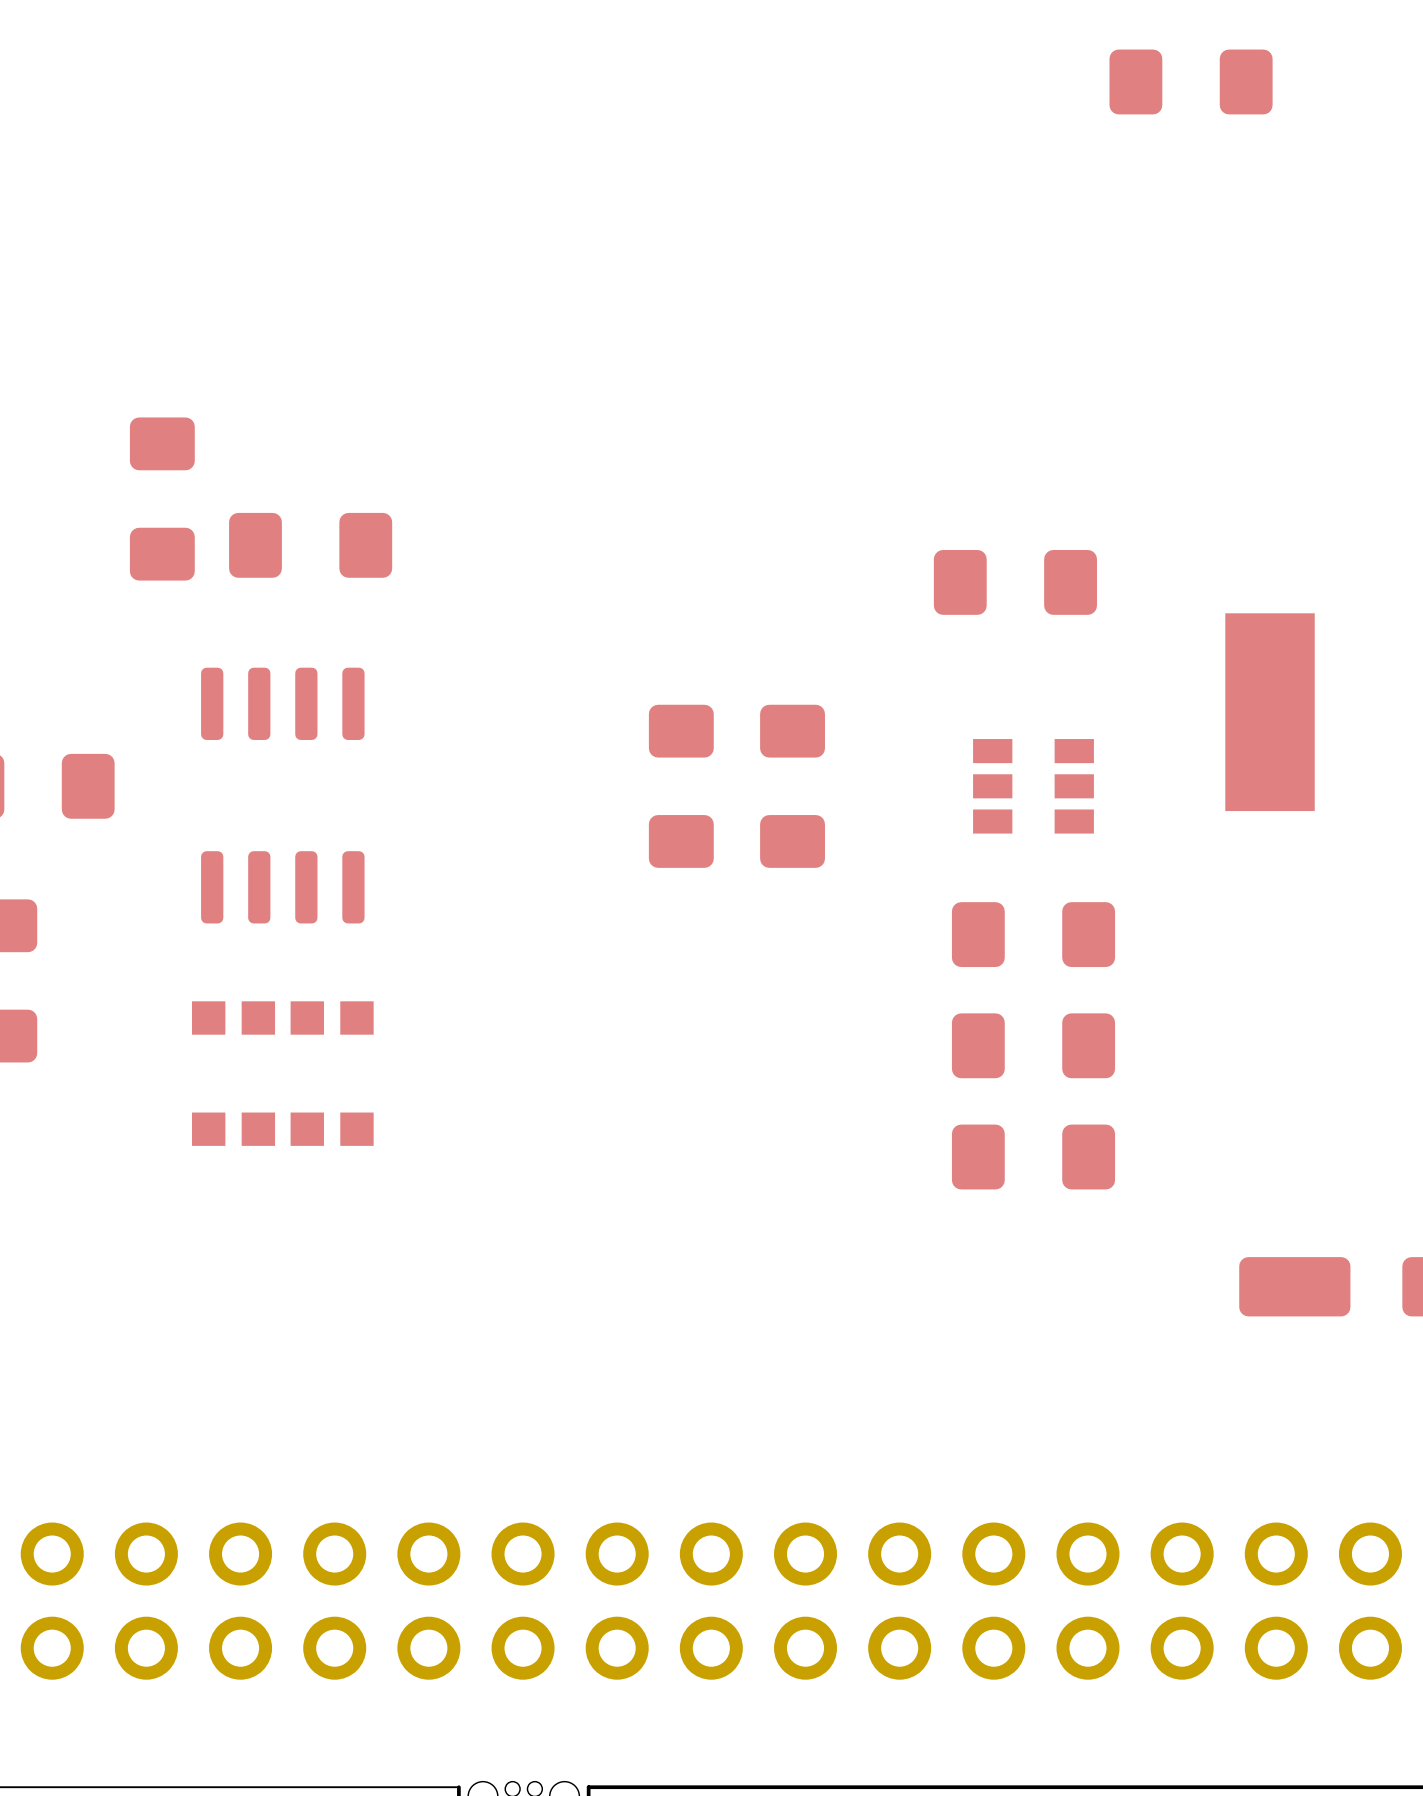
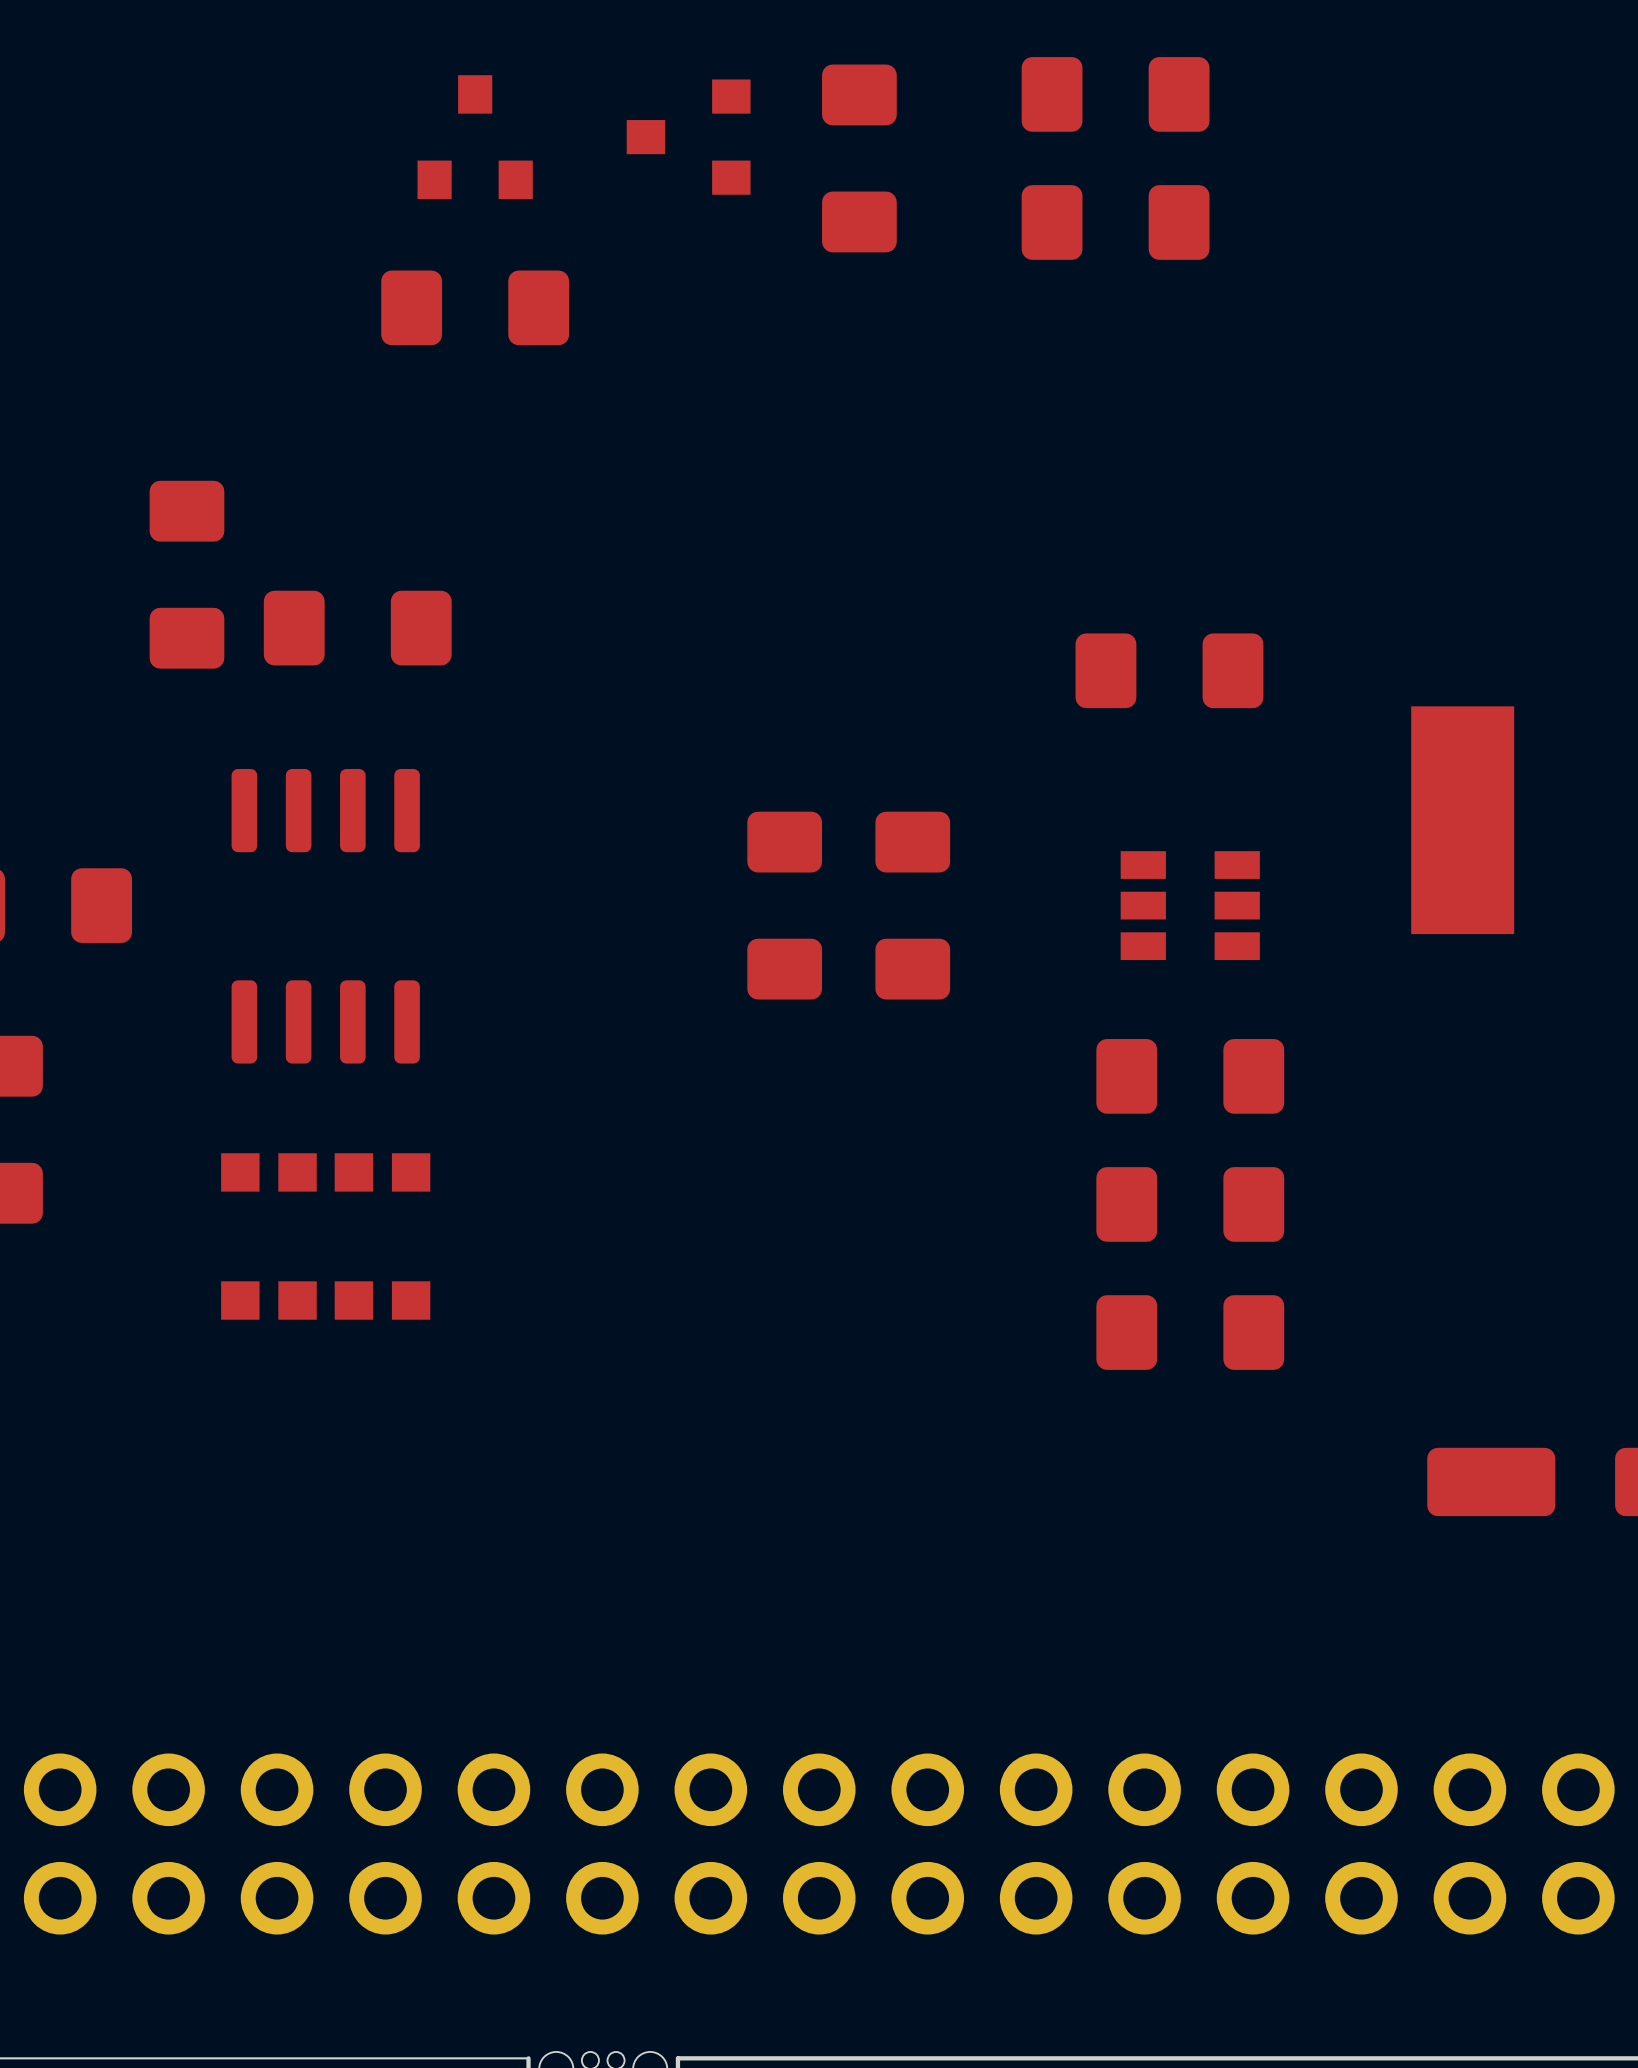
part: none -> (1115, 94)
part: (1191, 81) -> none
part: none -> (475, 137)
part: none -> (688, 137)
part: none -> (859, 158)
part: none -> (1115, 222)
part: none -> (475, 307)

